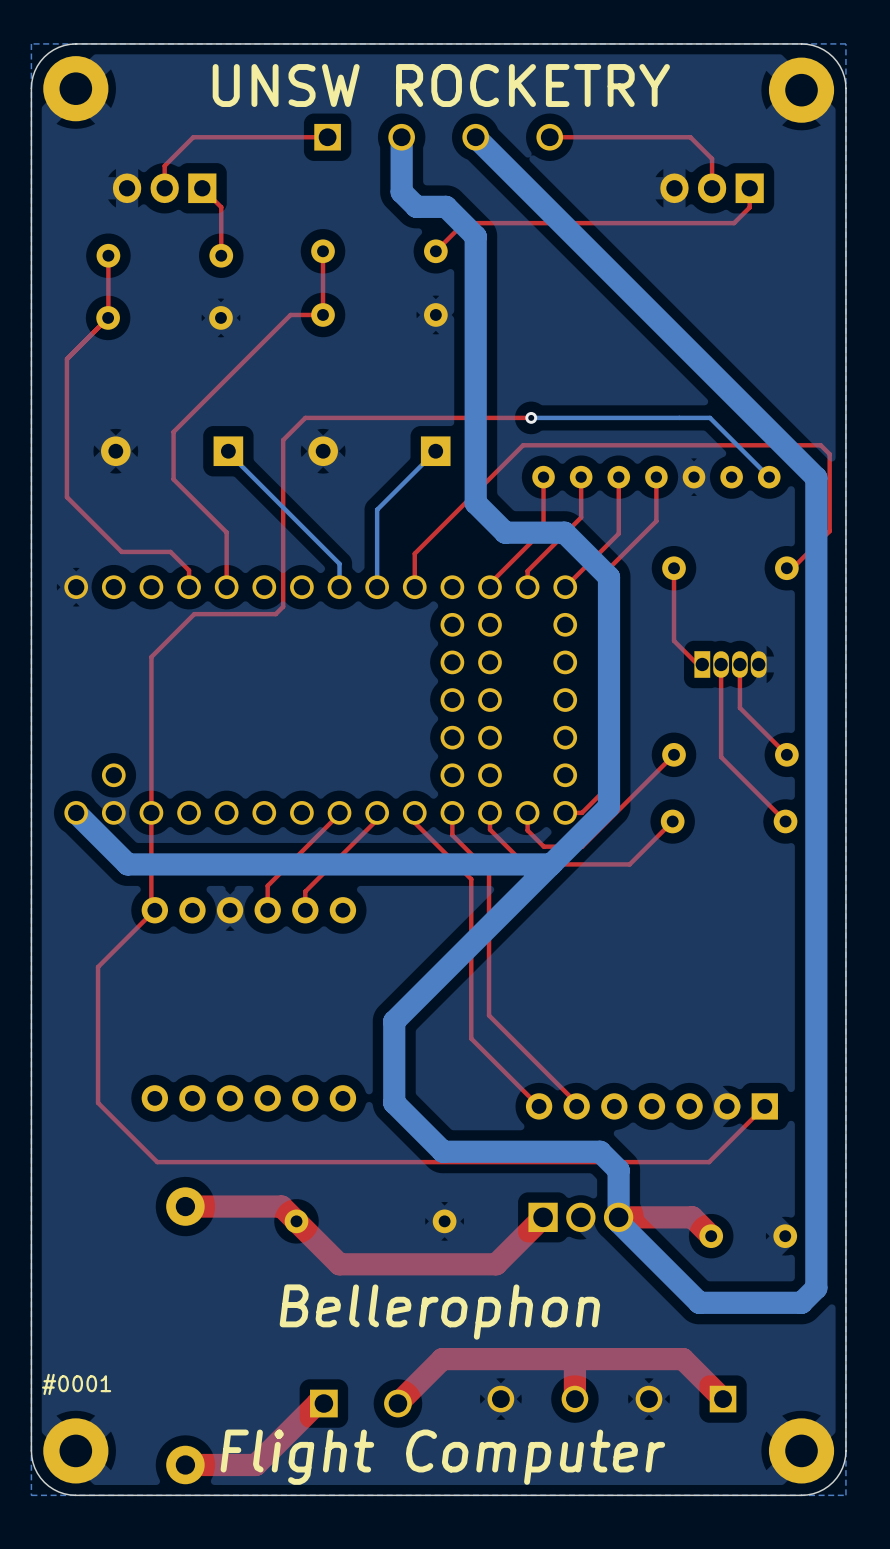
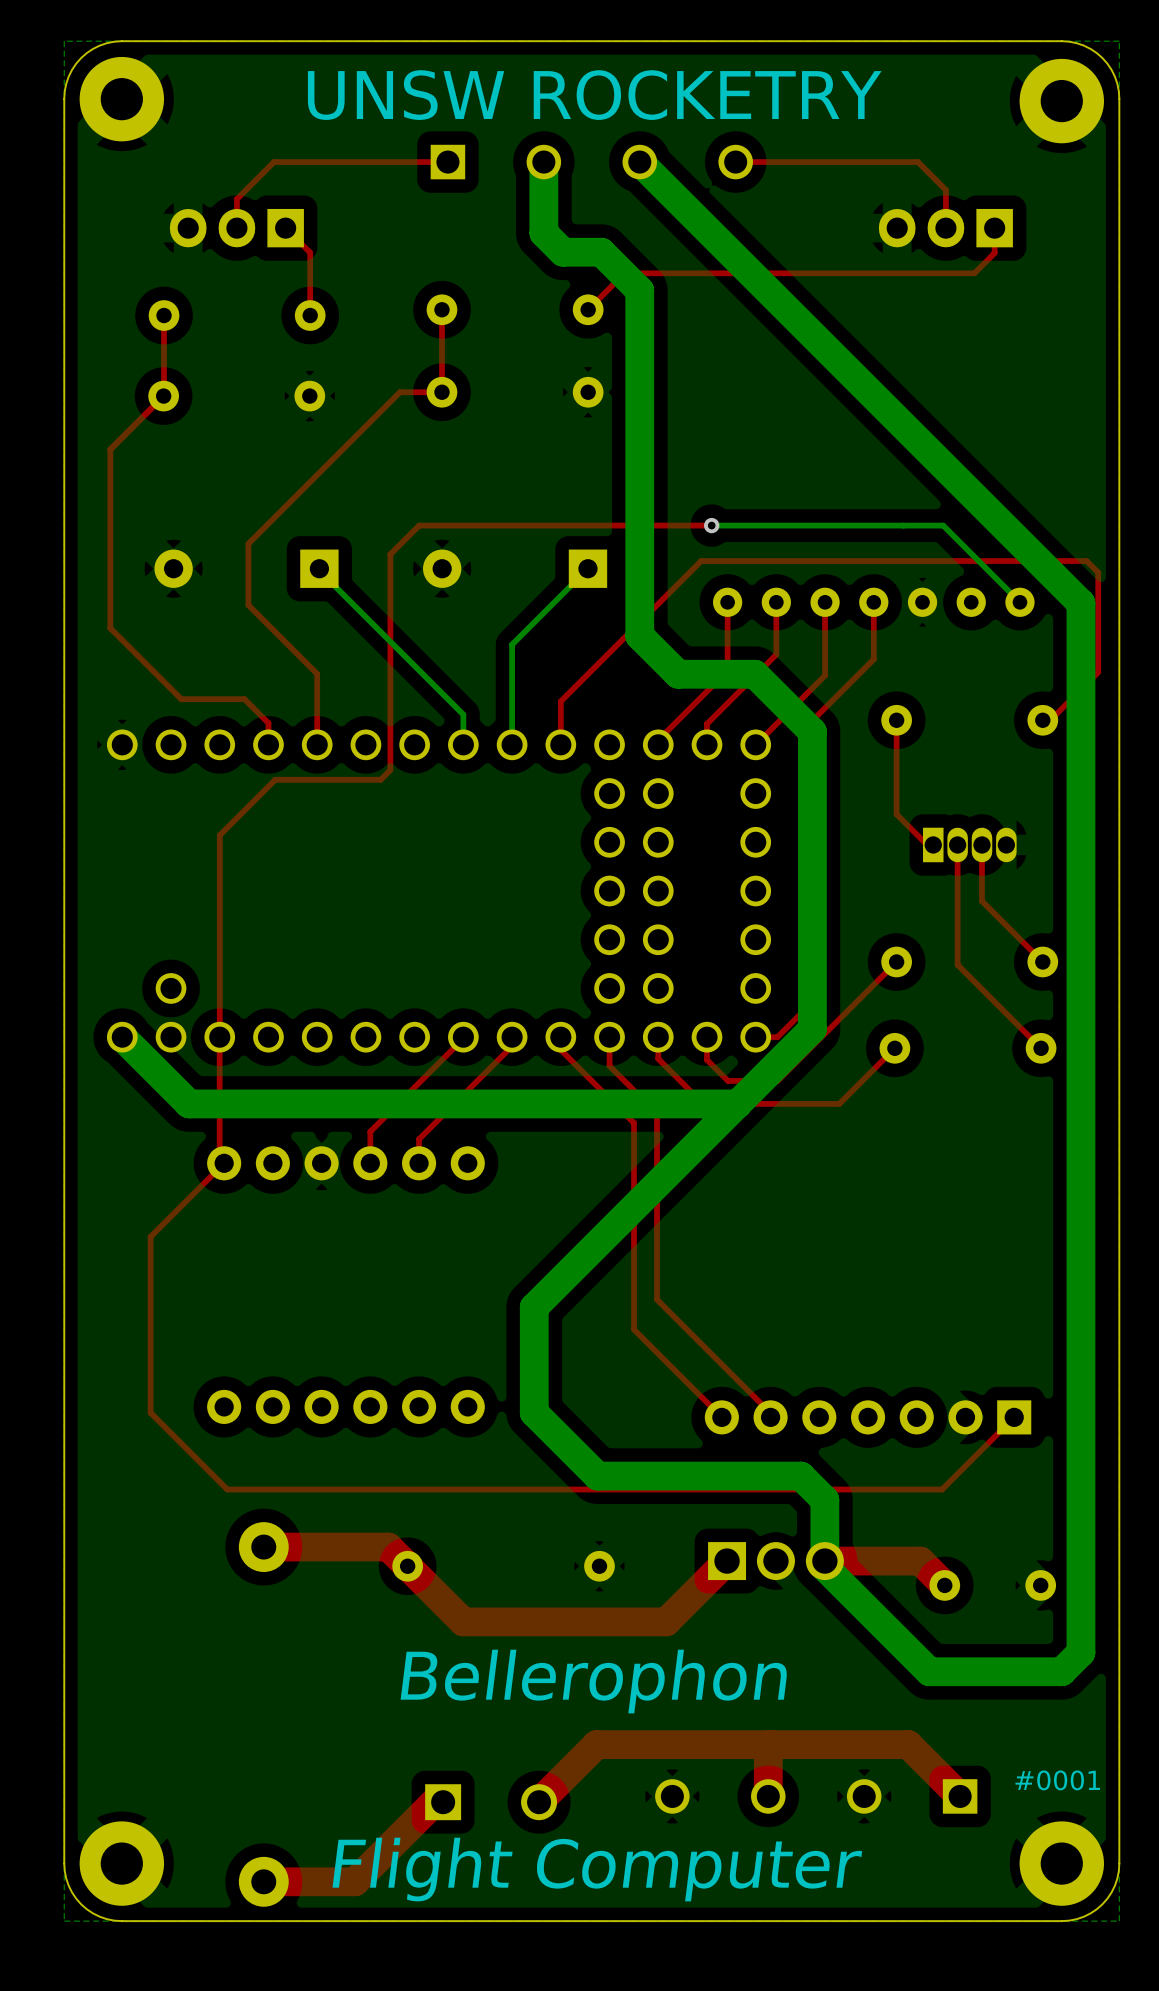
text: #0001 (76, 1384) -> none
text: none -> #0001 (1057, 1780)

